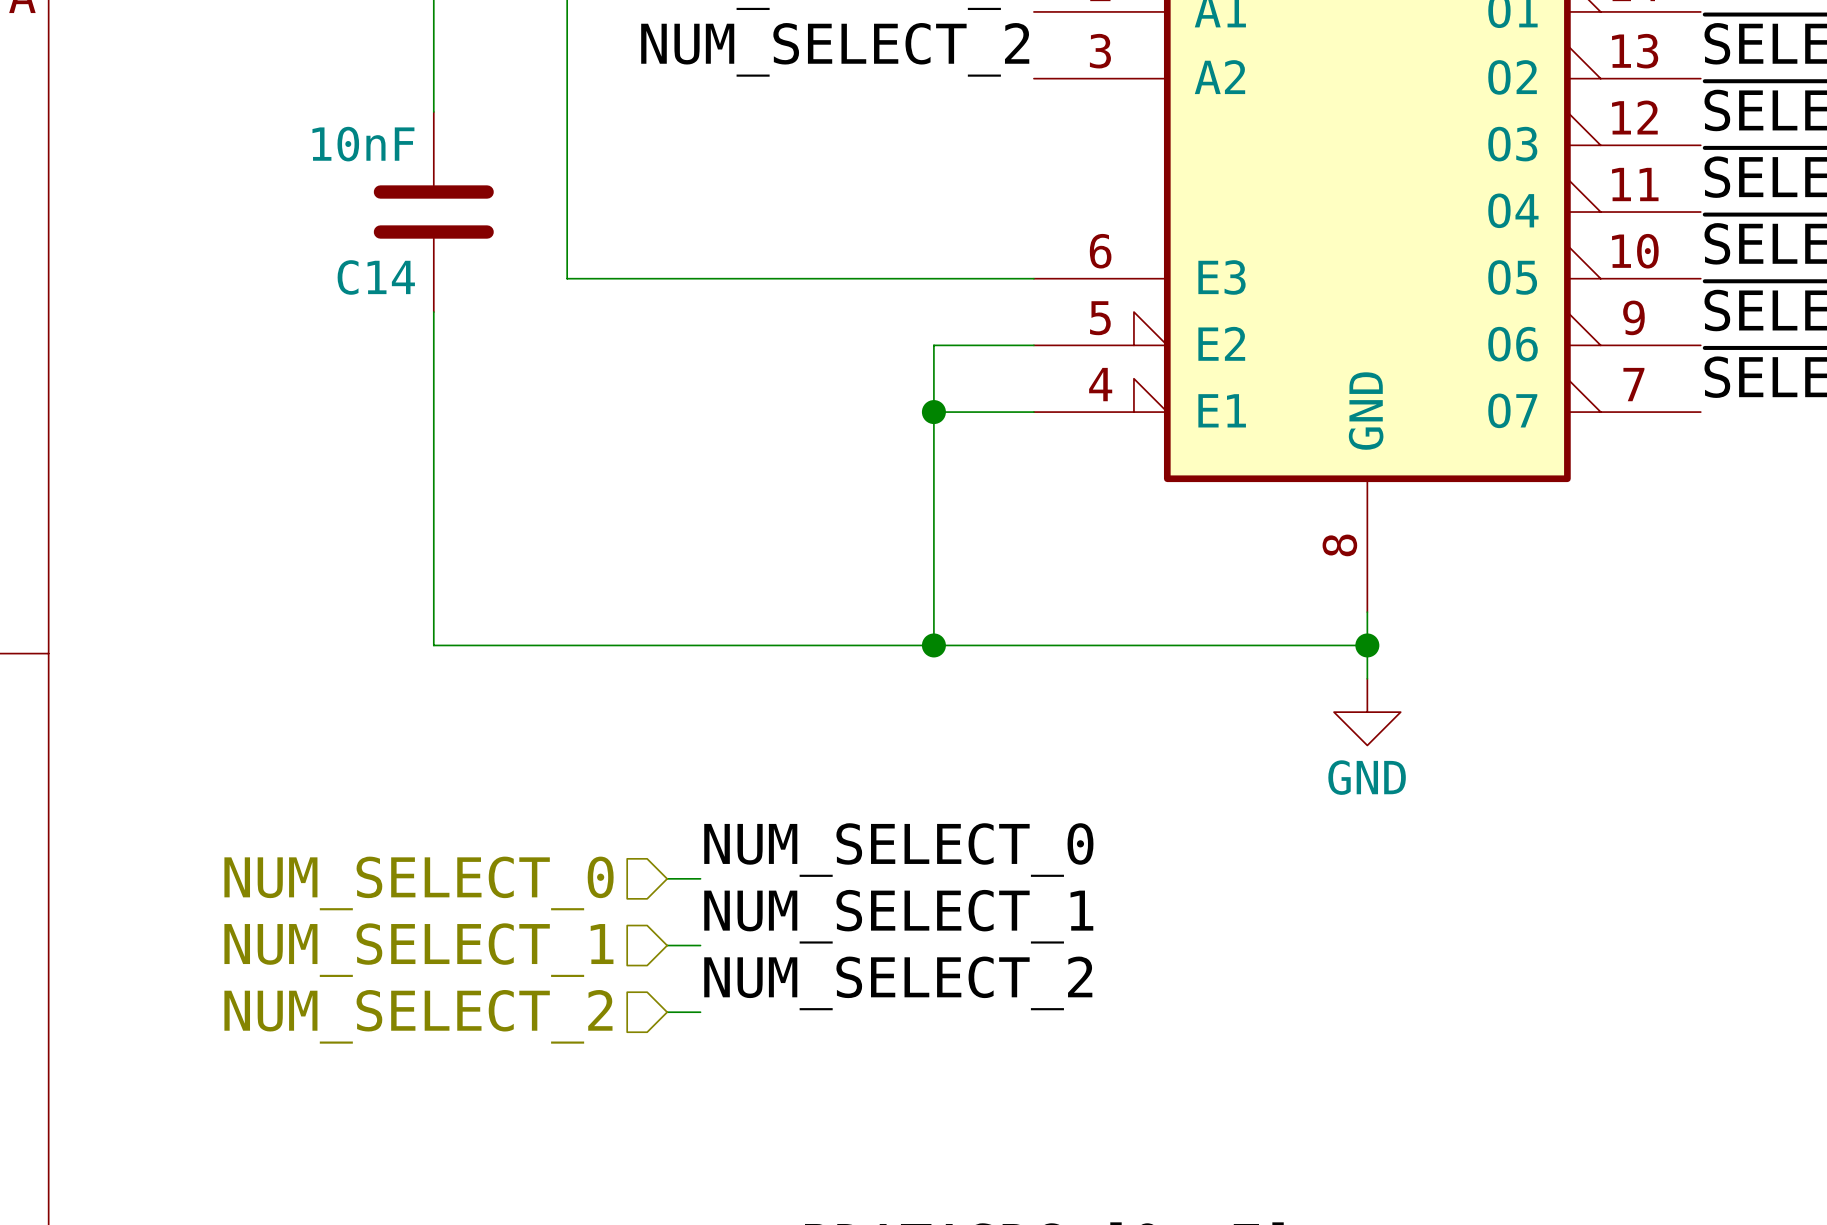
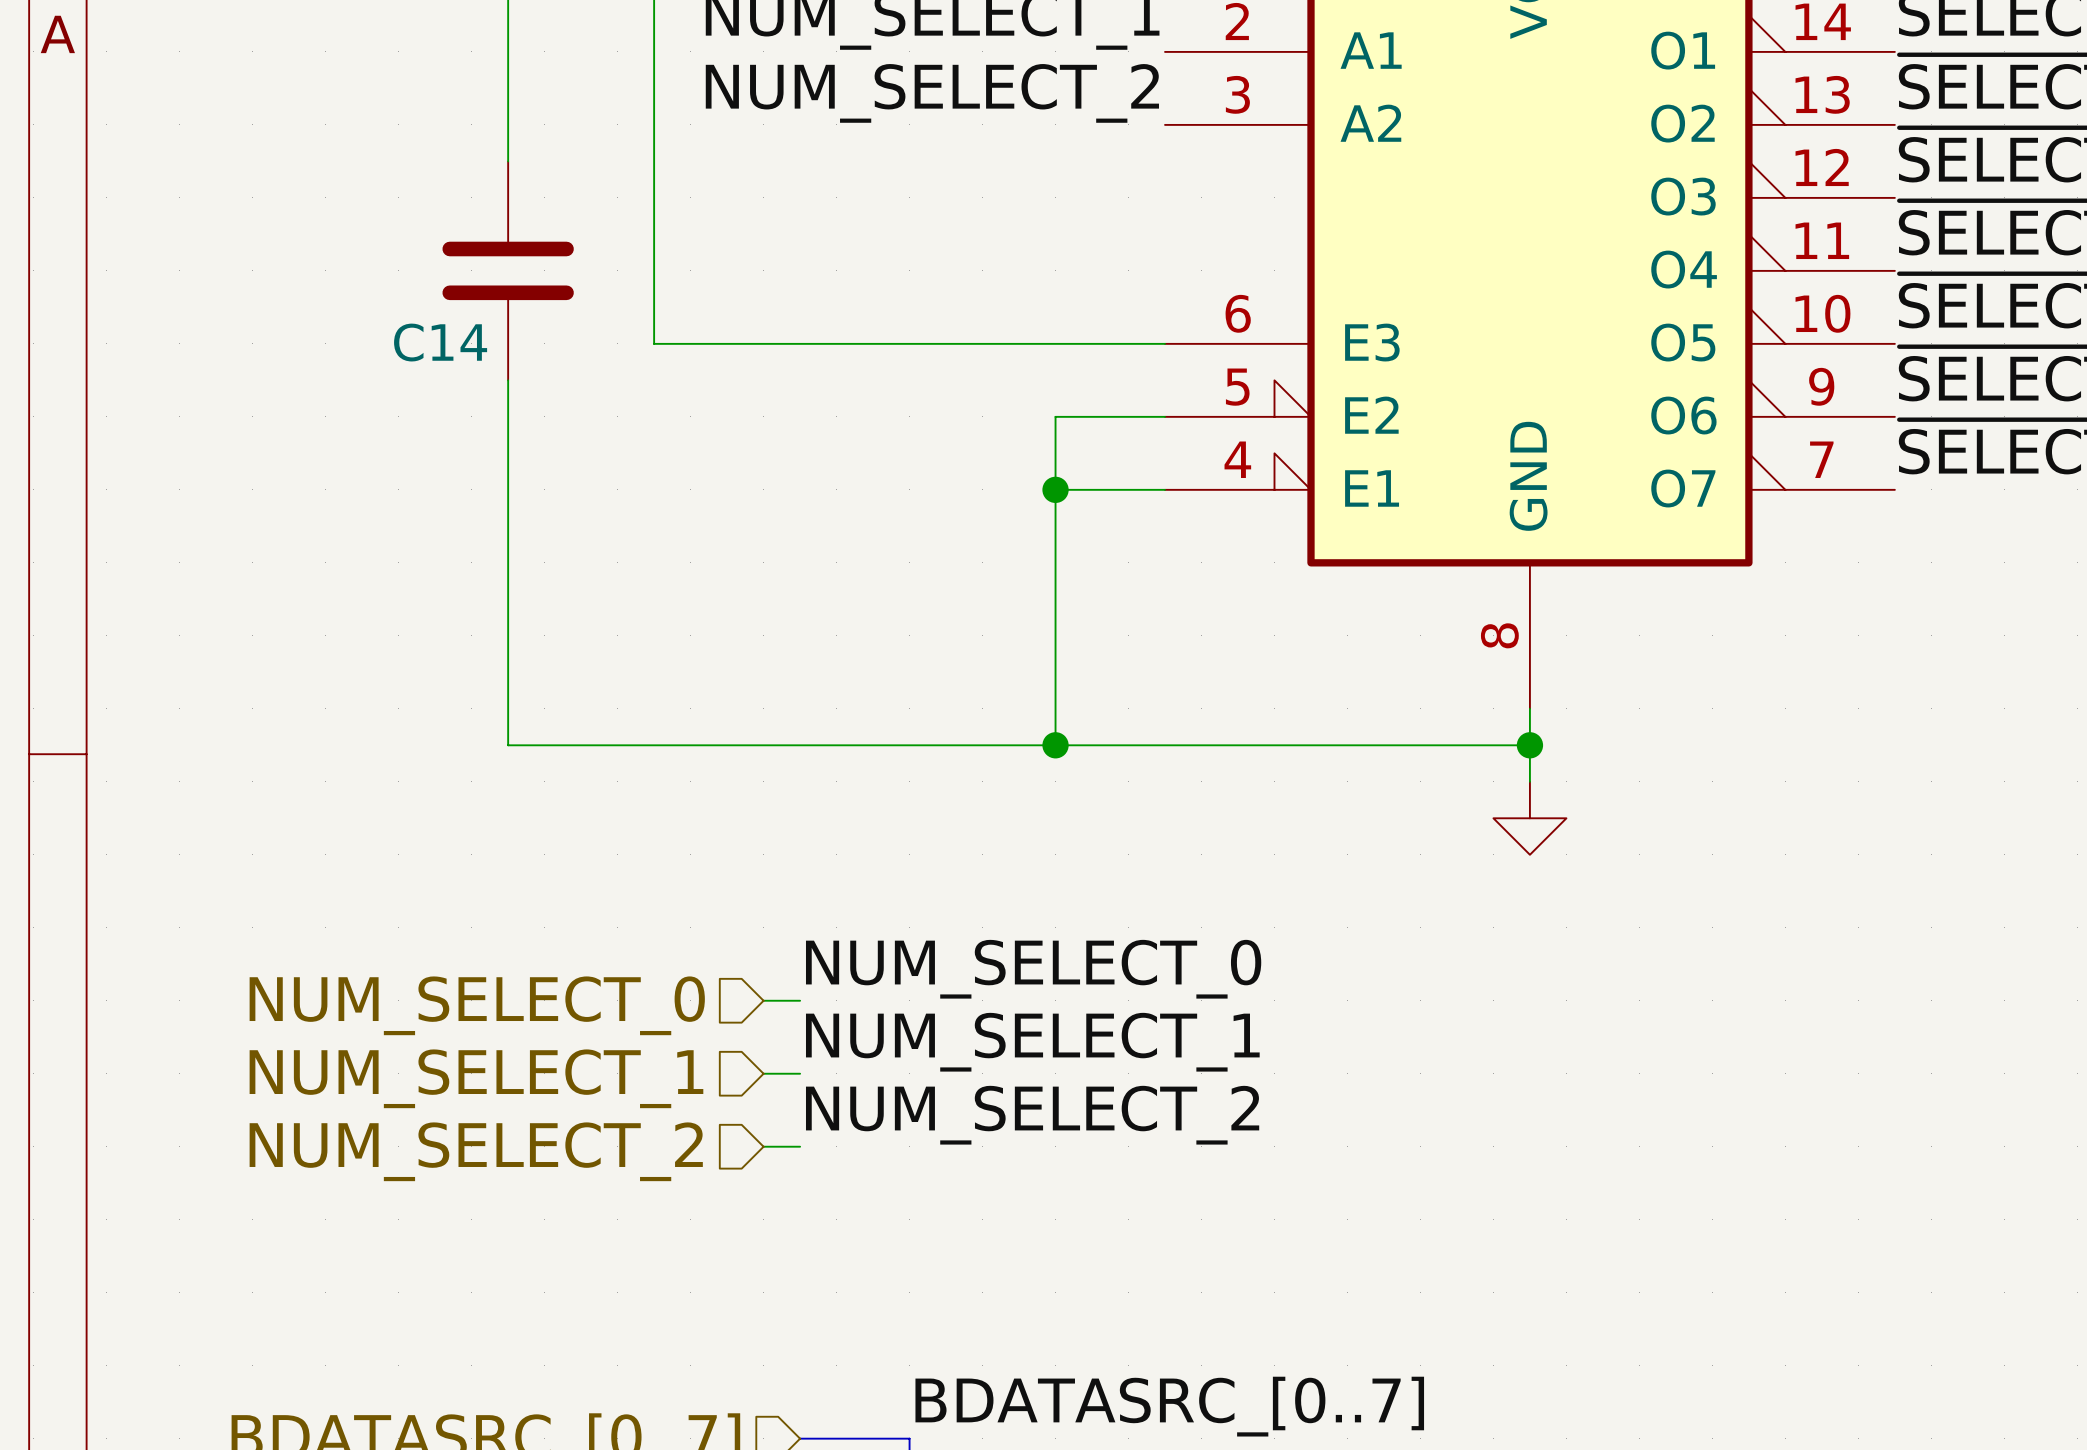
C14 value: 10nF (363, 144) -> none
power symbol text: GND (1367, 777) -> none

